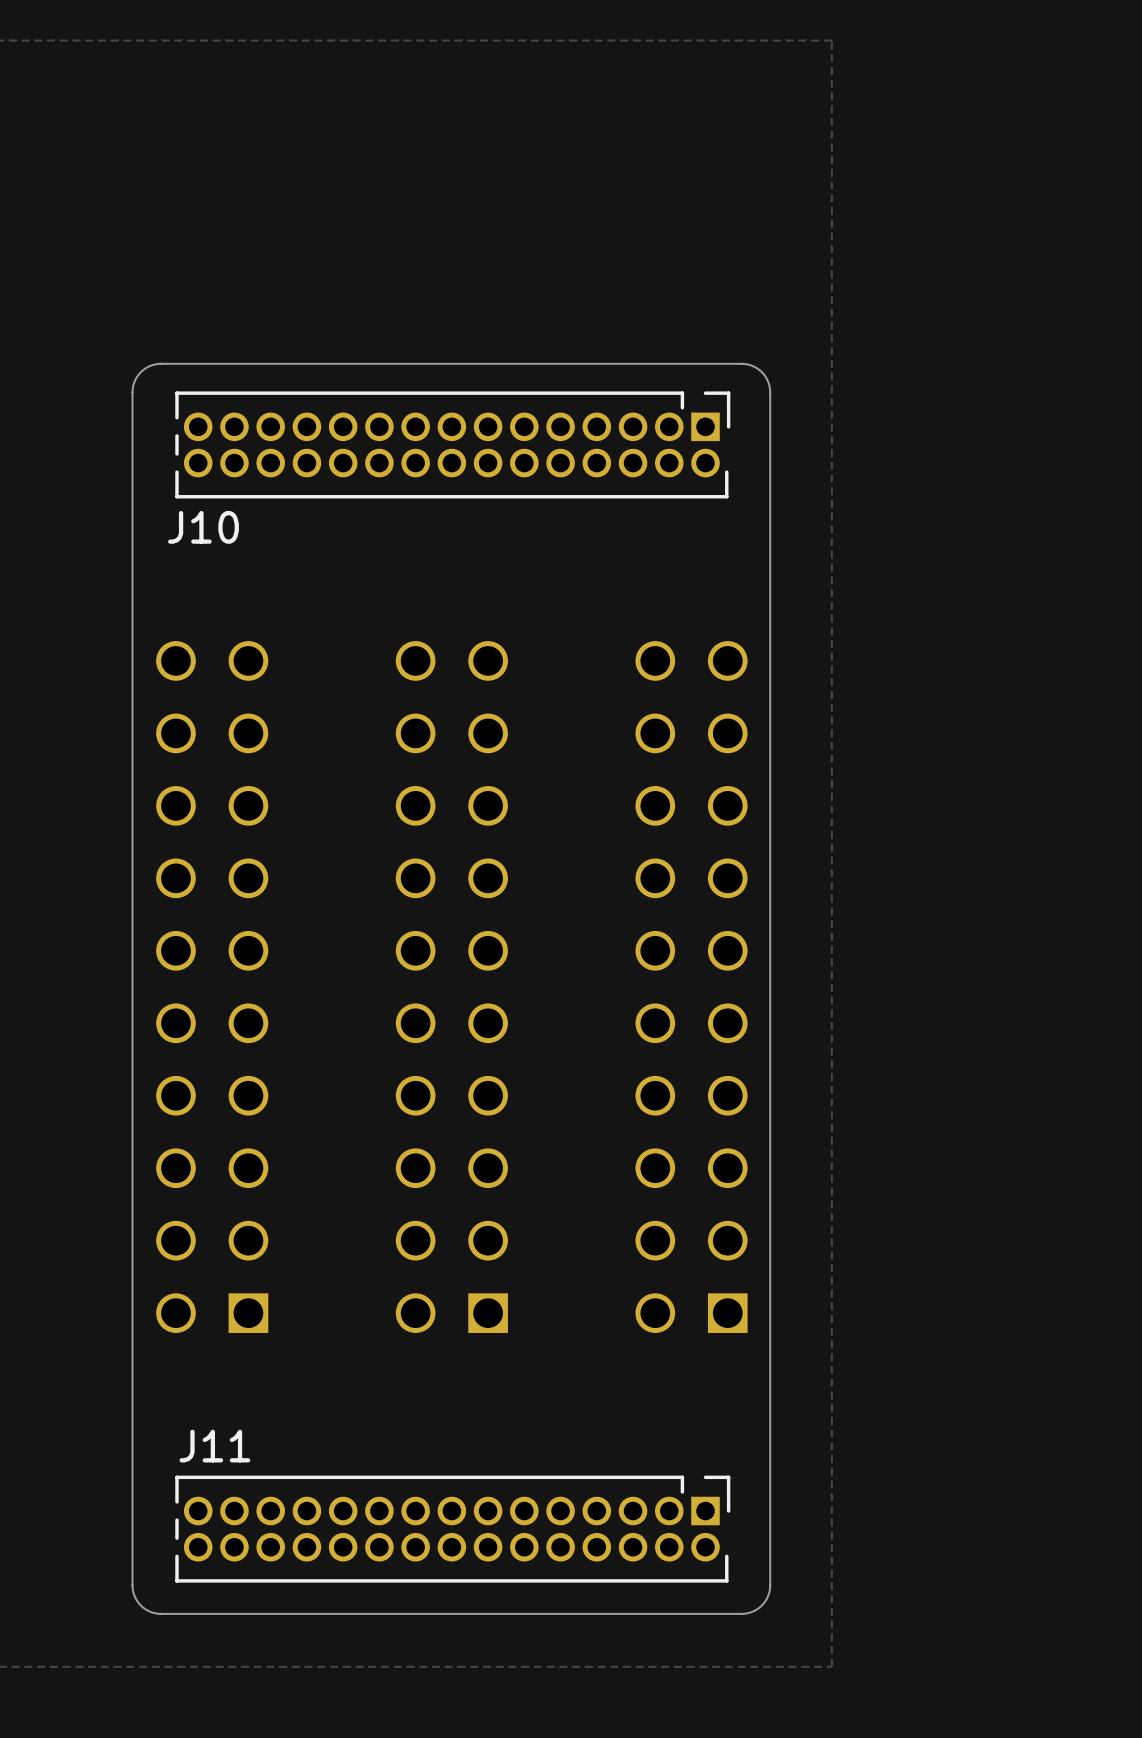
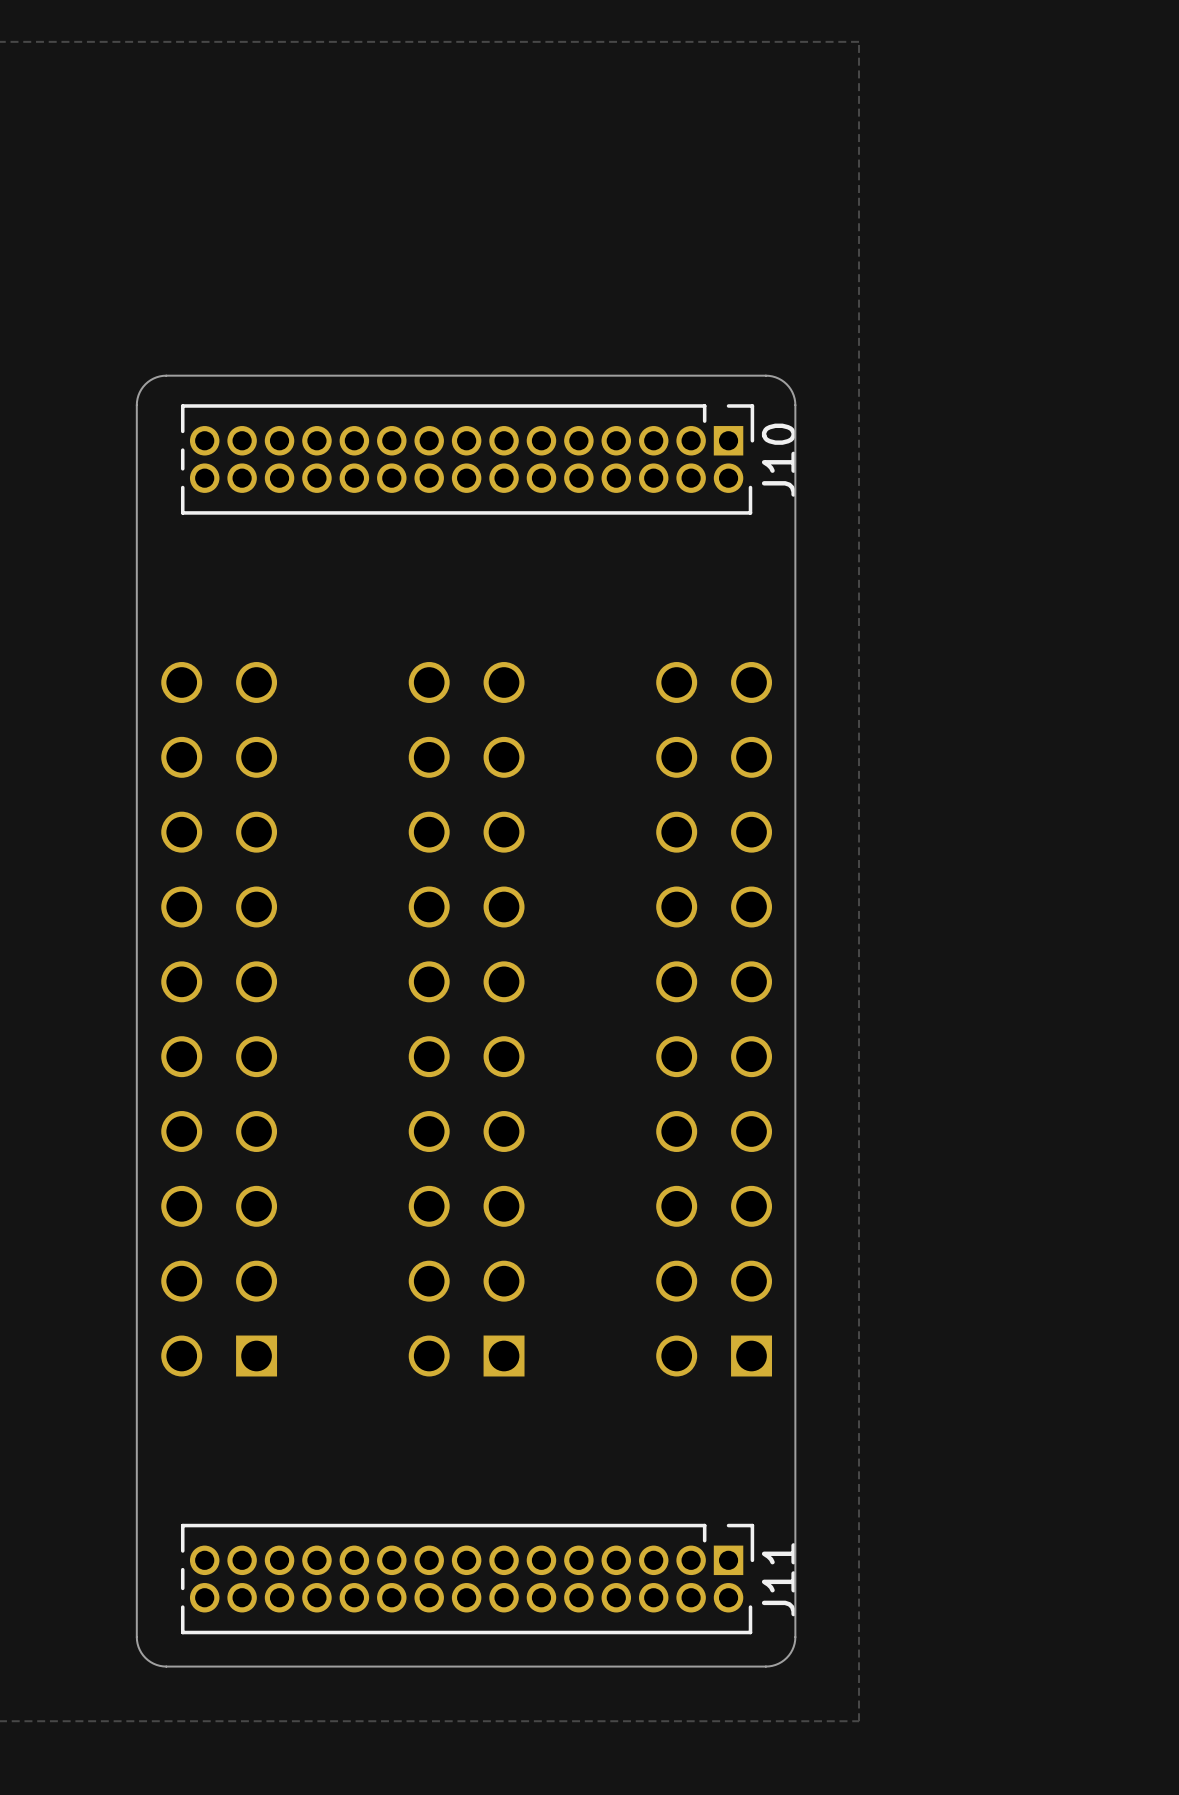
J10 name rotation: 0° (203, 527) -> 90° counterclockwise (778, 460)
J10 name position: J10 (203, 527) -> J10 (778, 460)
J11 name rotation: 0° (214, 1446) -> 90° counterclockwise (778, 1579)
J11 name position: J11 (214, 1446) -> J11 (778, 1579)

